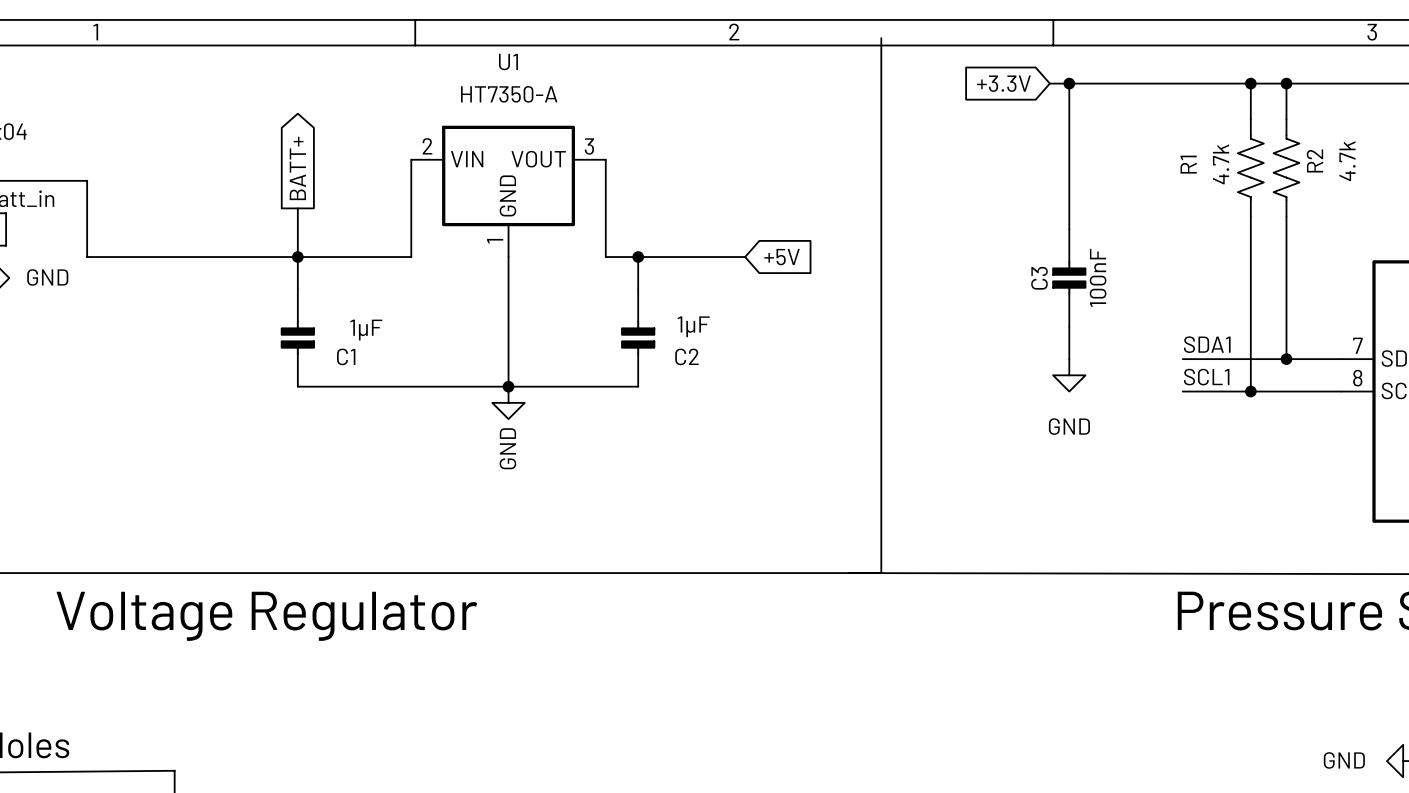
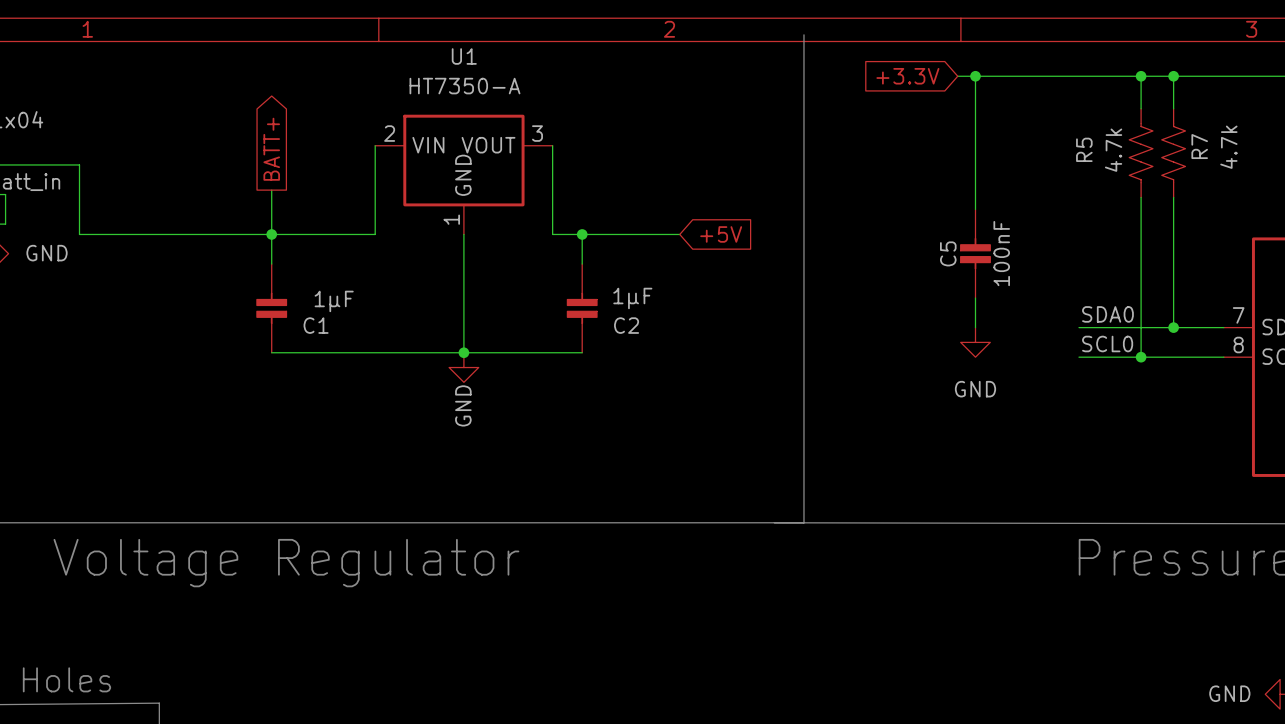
R2 name: R2 (1314, 160) -> R7 (1199, 146)
R1 name: R1 (1188, 164) -> R5 (1084, 149)
C3 name: C3 (1039, 278) -> C5 (948, 253)
label: SDA1 (1207, 344) -> SDA0 (1107, 314)
label: SCL1 (1206, 377) -> SCL0 (1107, 343)

